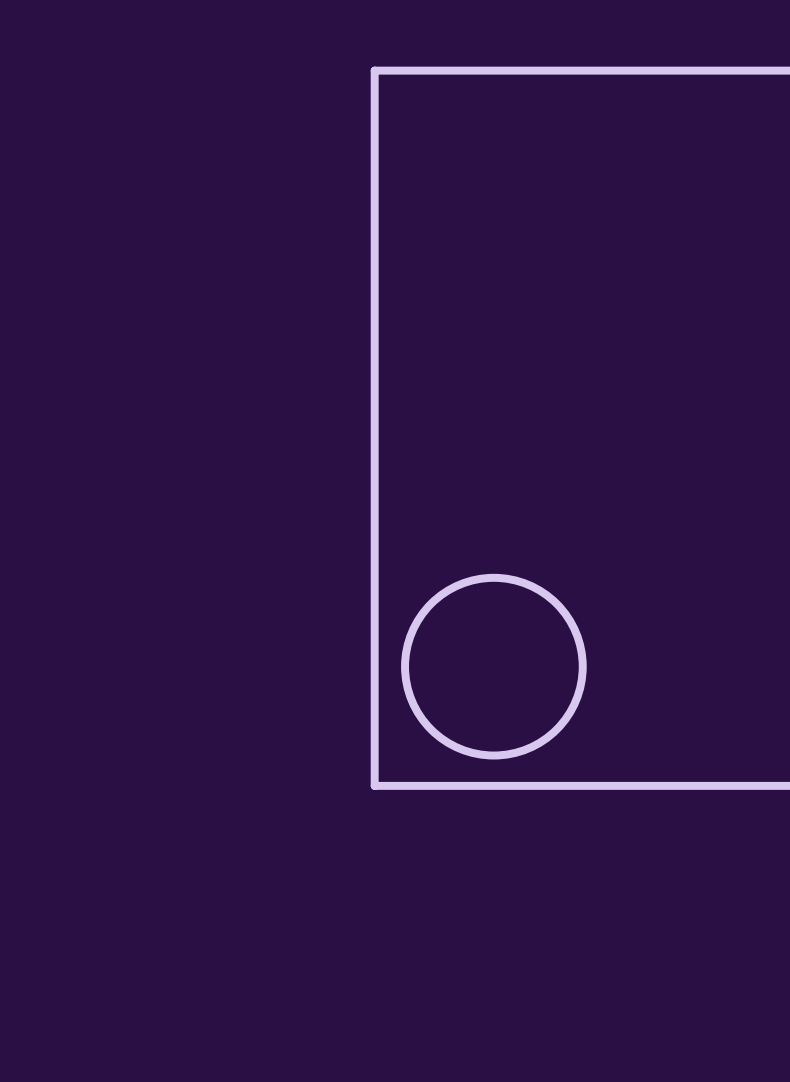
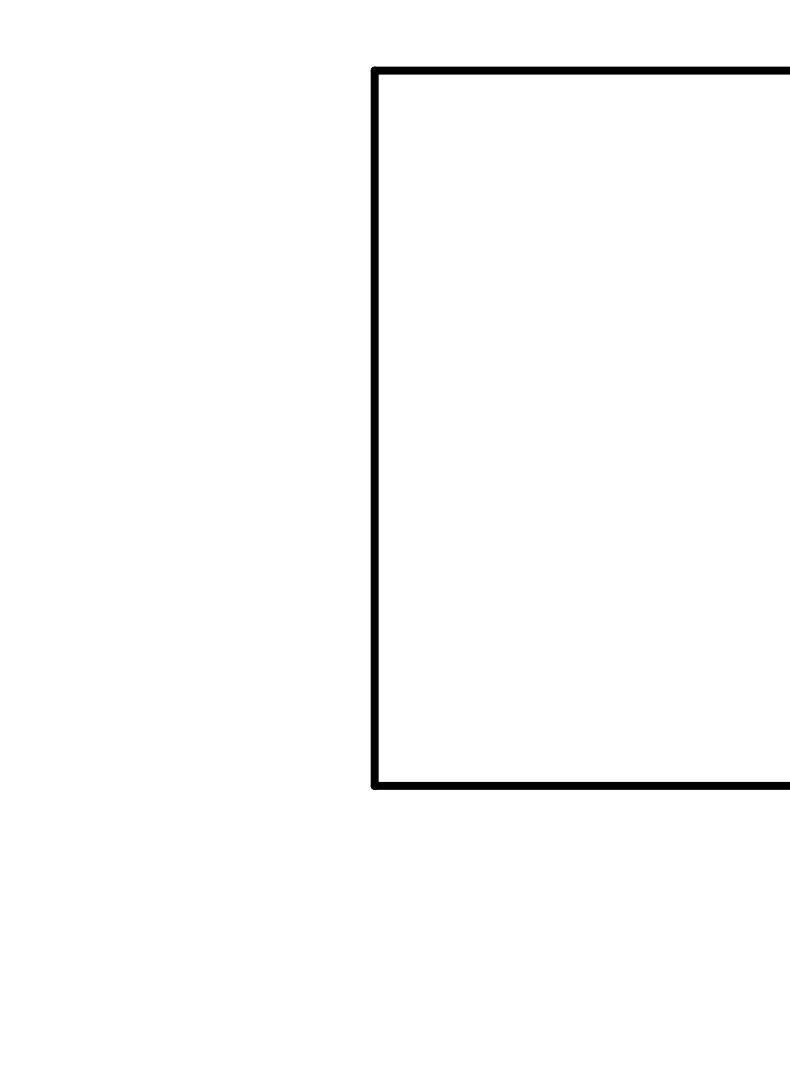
round board edge: [401, 573, 587, 760] -> none

